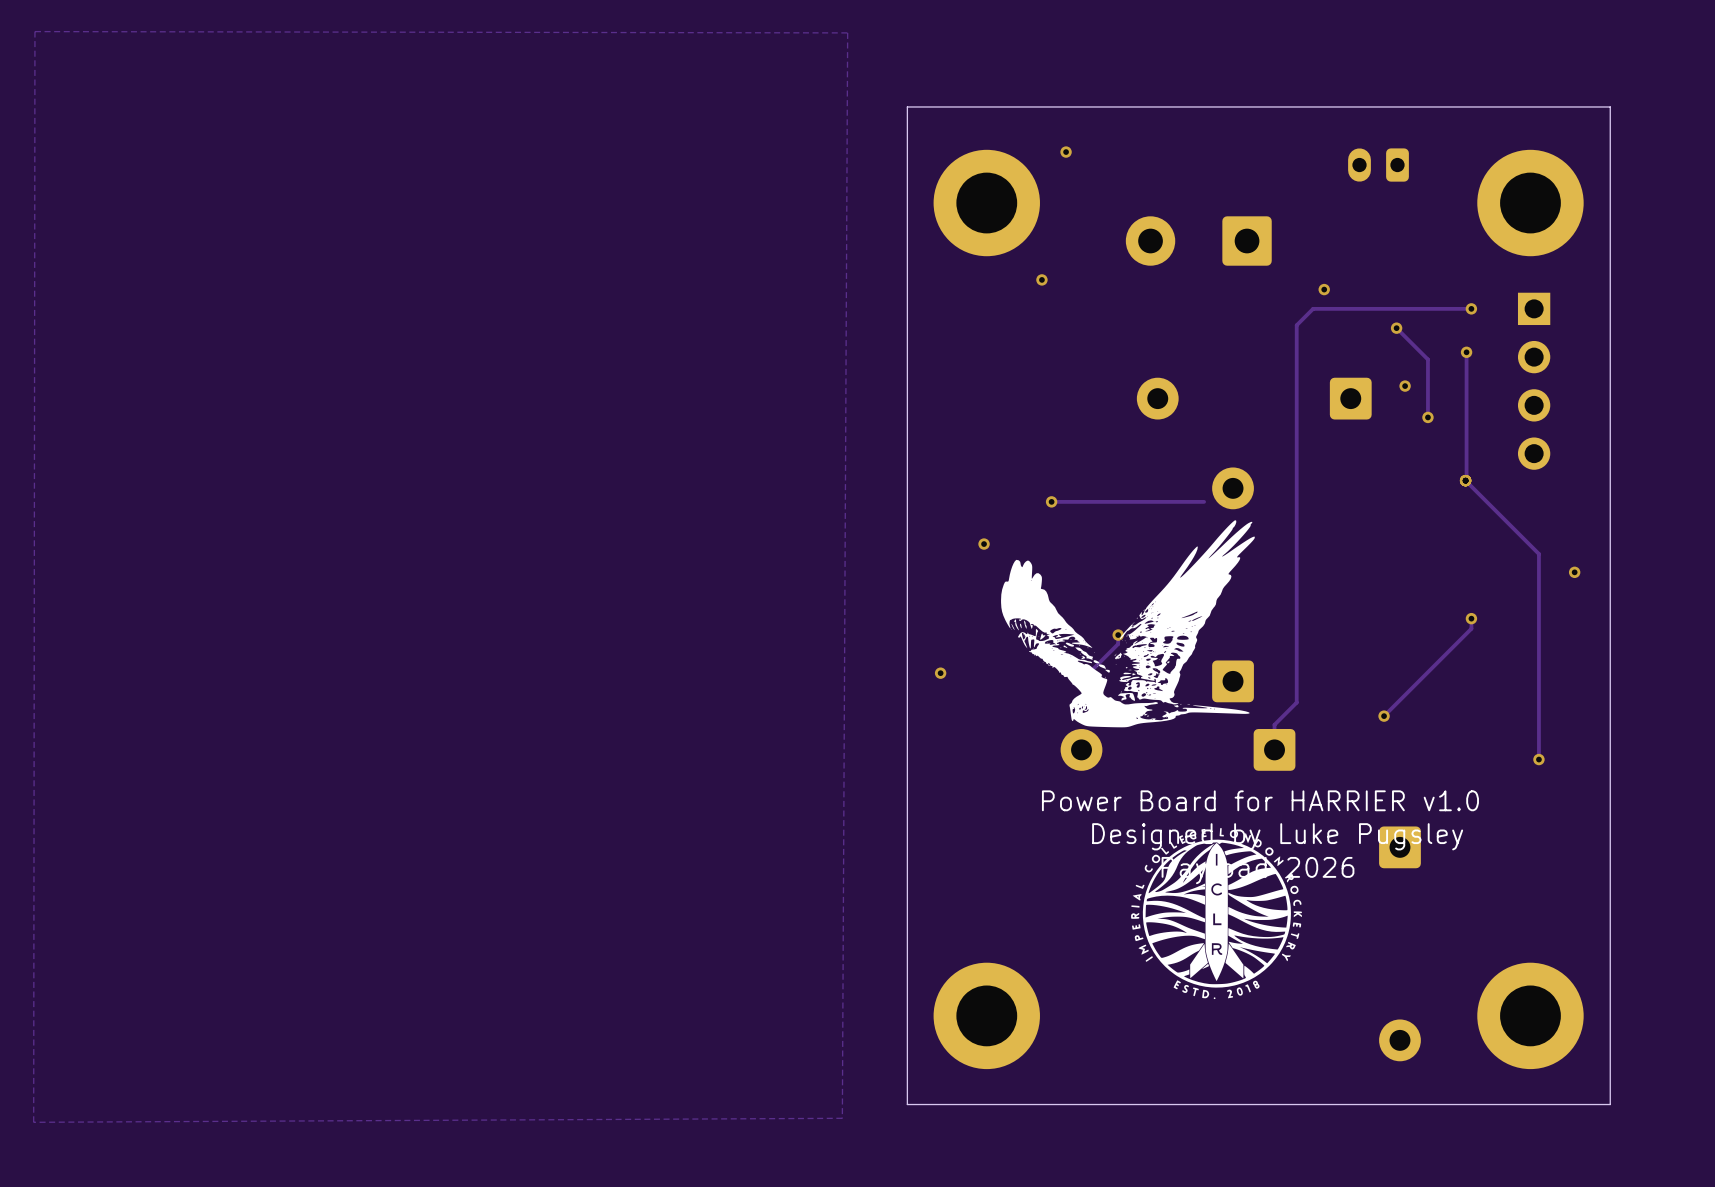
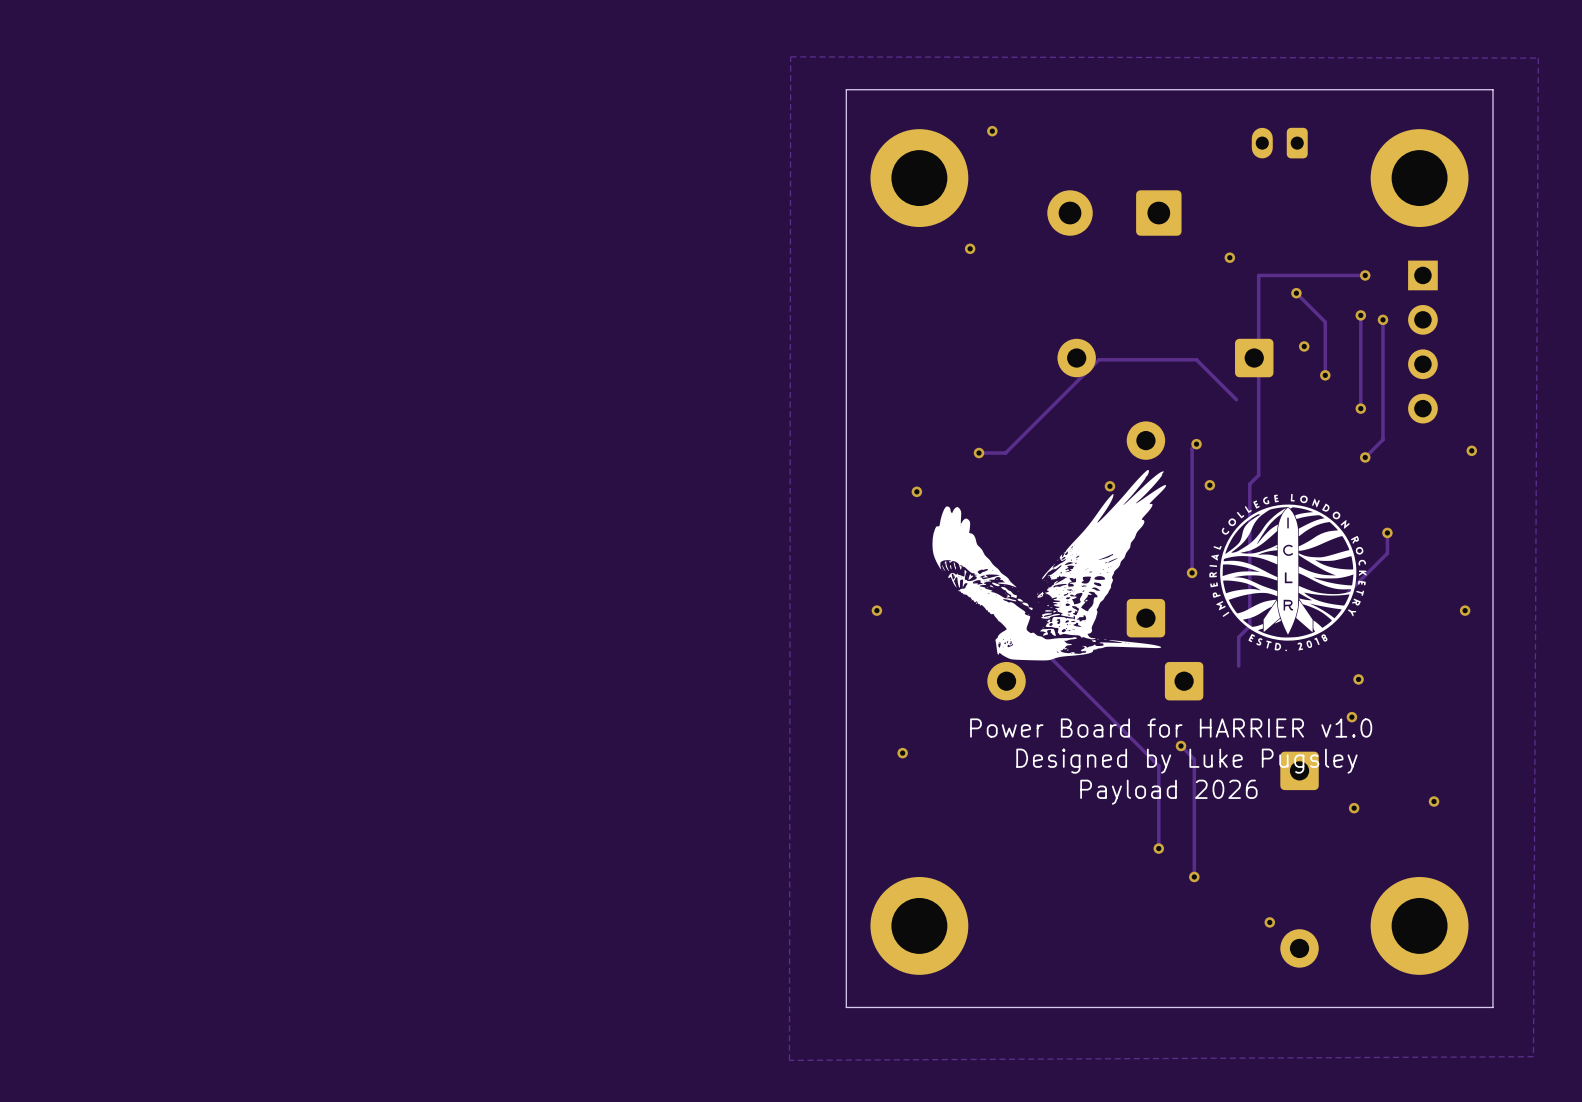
zone outline: (34, 31) (847, 32) (842, 1118) (33, 1122) (34, 31) -> none
zone outline: none -> (790, 56) (1538, 58) (1533, 1056) (789, 1060) (790, 57)
track: (1355, 308) (1313, 308) (1296, 325) (1296, 702) (1274, 724) (1274, 749) -> (1258, 275) (1258, 475) (1249, 484) (1249, 626) (1238, 637) (1238, 666)
track: none -> (1382, 319) (1382, 439) (1365, 457)
via: none -> (1382, 319)
track: (1466, 453) (1465, 480) (1538, 553) (1538, 759) -> none
via: none -> (1360, 408)
via: (1465, 480) -> none
track: none -> (1196, 444) (1192, 448) (1192, 572)
via: none -> (1196, 444)
via: none -> (1471, 450)
track: (1204, 501) (1080, 501) -> (1236, 399) (1196, 359) (1098, 359) (1005, 453)
via: none -> (1365, 457)
via: none -> (1209, 485)
via: none -> (1109, 486)
via: (1574, 572) -> none
track: none -> (1387, 532) (1387, 553) (1347, 593)
track: (1471, 618) (1471, 628) (1384, 716) -> none
via position: (1471, 618) -> (1387, 532)
via: none -> (1192, 572)
track: (1118, 635) (1118, 644) (1081, 680) (1085, 680) -> none
via: (1118, 635) -> none
via: none -> (1465, 610)
via: (1384, 716) -> none
track: none -> (1050, 657) (1158, 765) (1158, 848)
via: none -> (1358, 679)
via: (1538, 759) -> none
via: none -> (1351, 717)
track: none -> (1181, 746) (1194, 759) (1194, 876)
via: none -> (1181, 746)
via: none -> (902, 753)
via: none -> (1434, 801)
via: none -> (1354, 808)
drawing position: (1216, 913) -> (1287, 572)
via: none -> (1158, 848)
via: none -> (1194, 876)
via: none -> (1269, 922)

